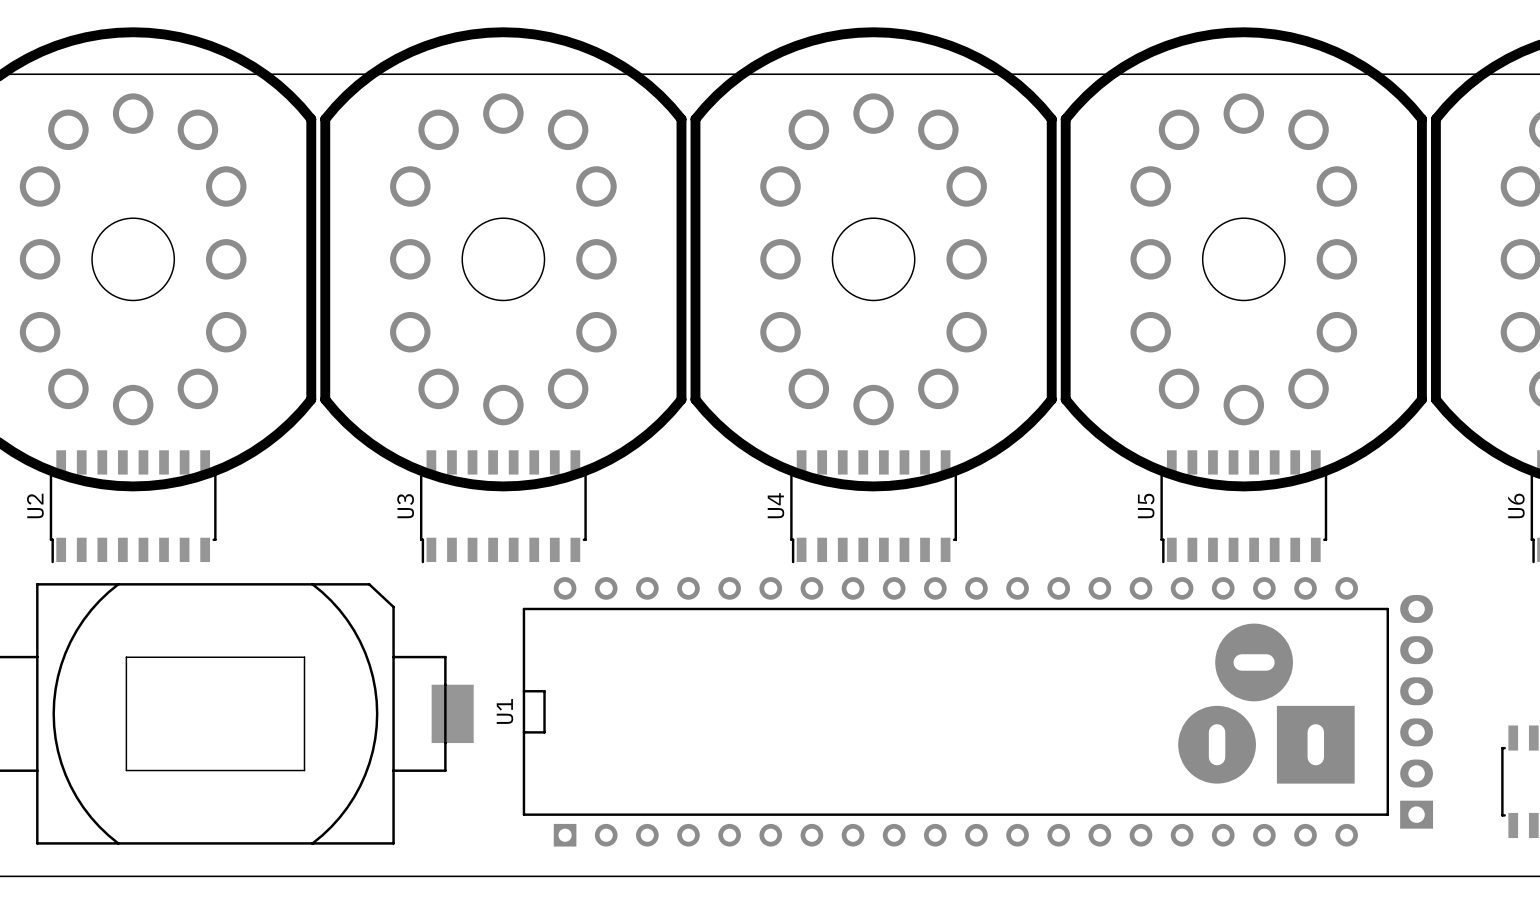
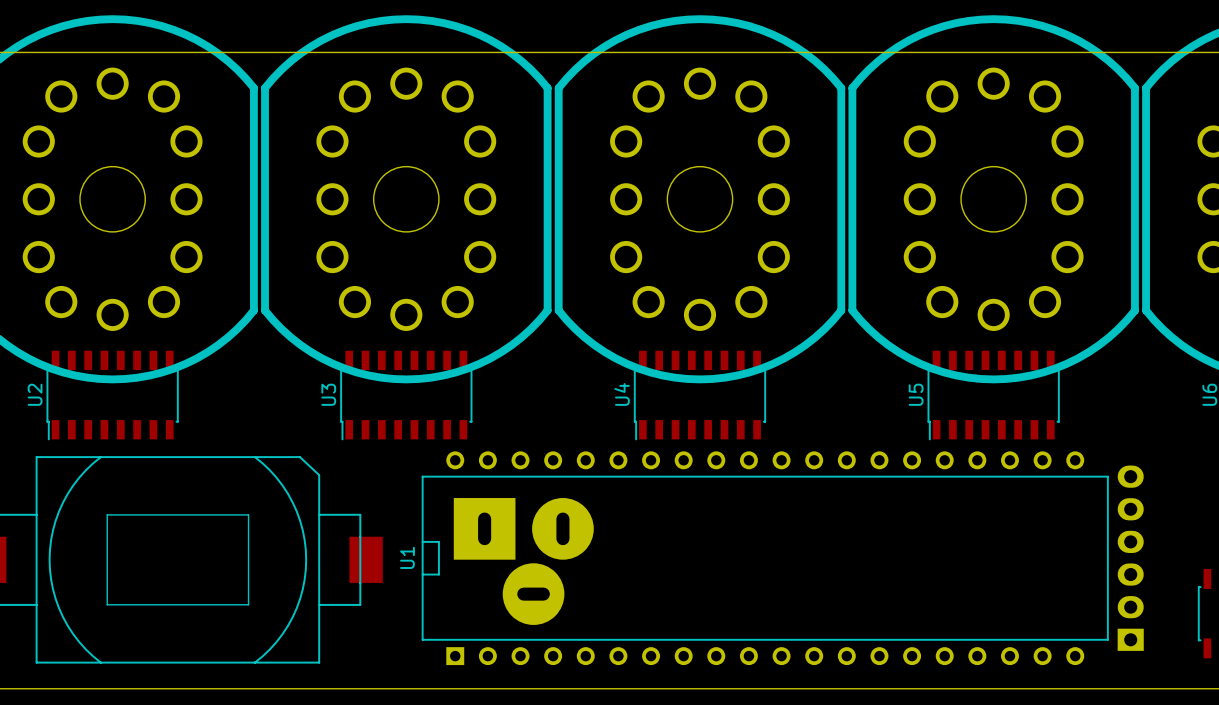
part: (1266, 703) -> none
part: none -> (523, 561)

